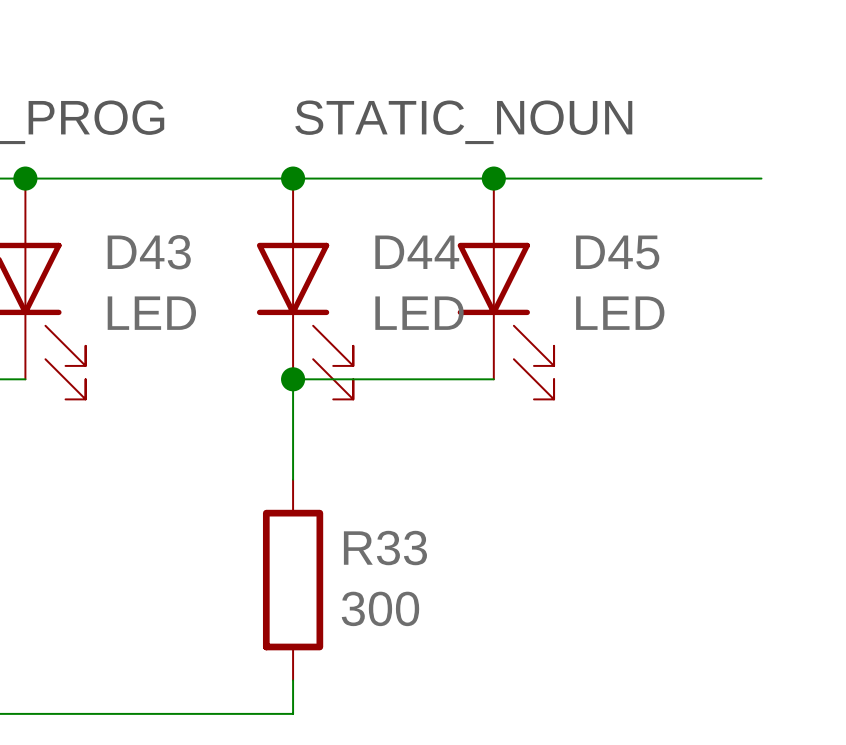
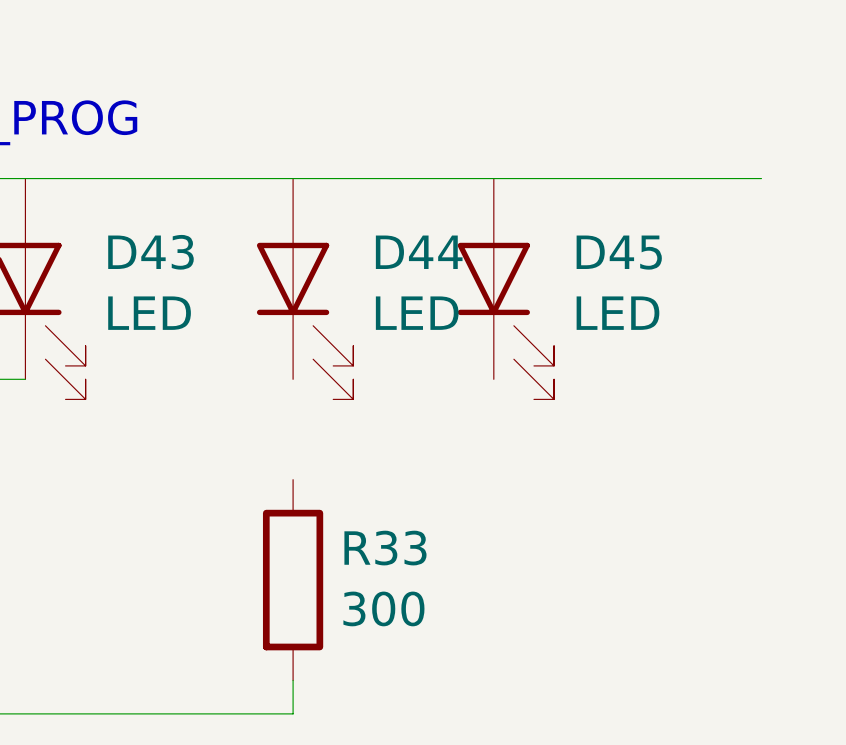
text: STATIC_NOUN (463, 122) -> none
junction: (25, 178) -> none
junction: (293, 178) -> none
junction: (493, 178) -> none
junction: (293, 379) -> none
wire: (493, 379) (293, 379) (293, 479) -> none

